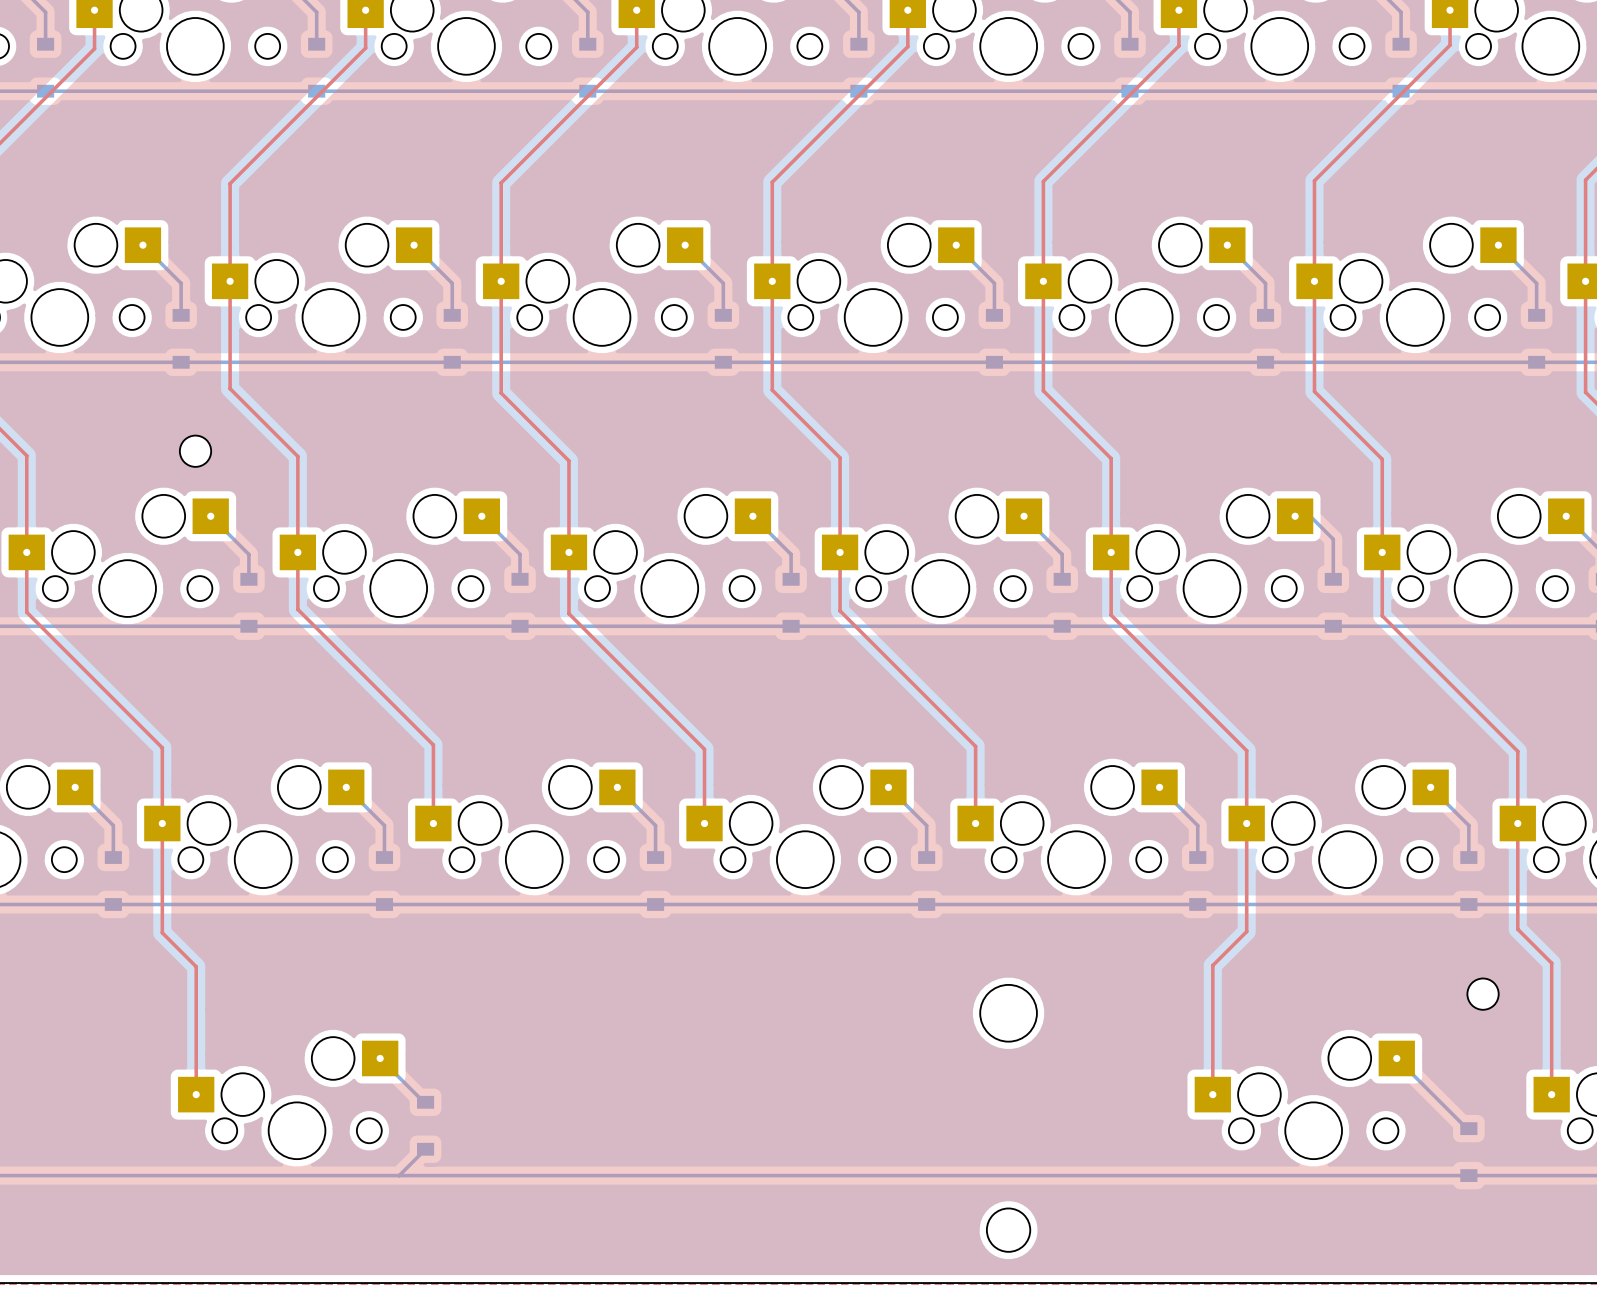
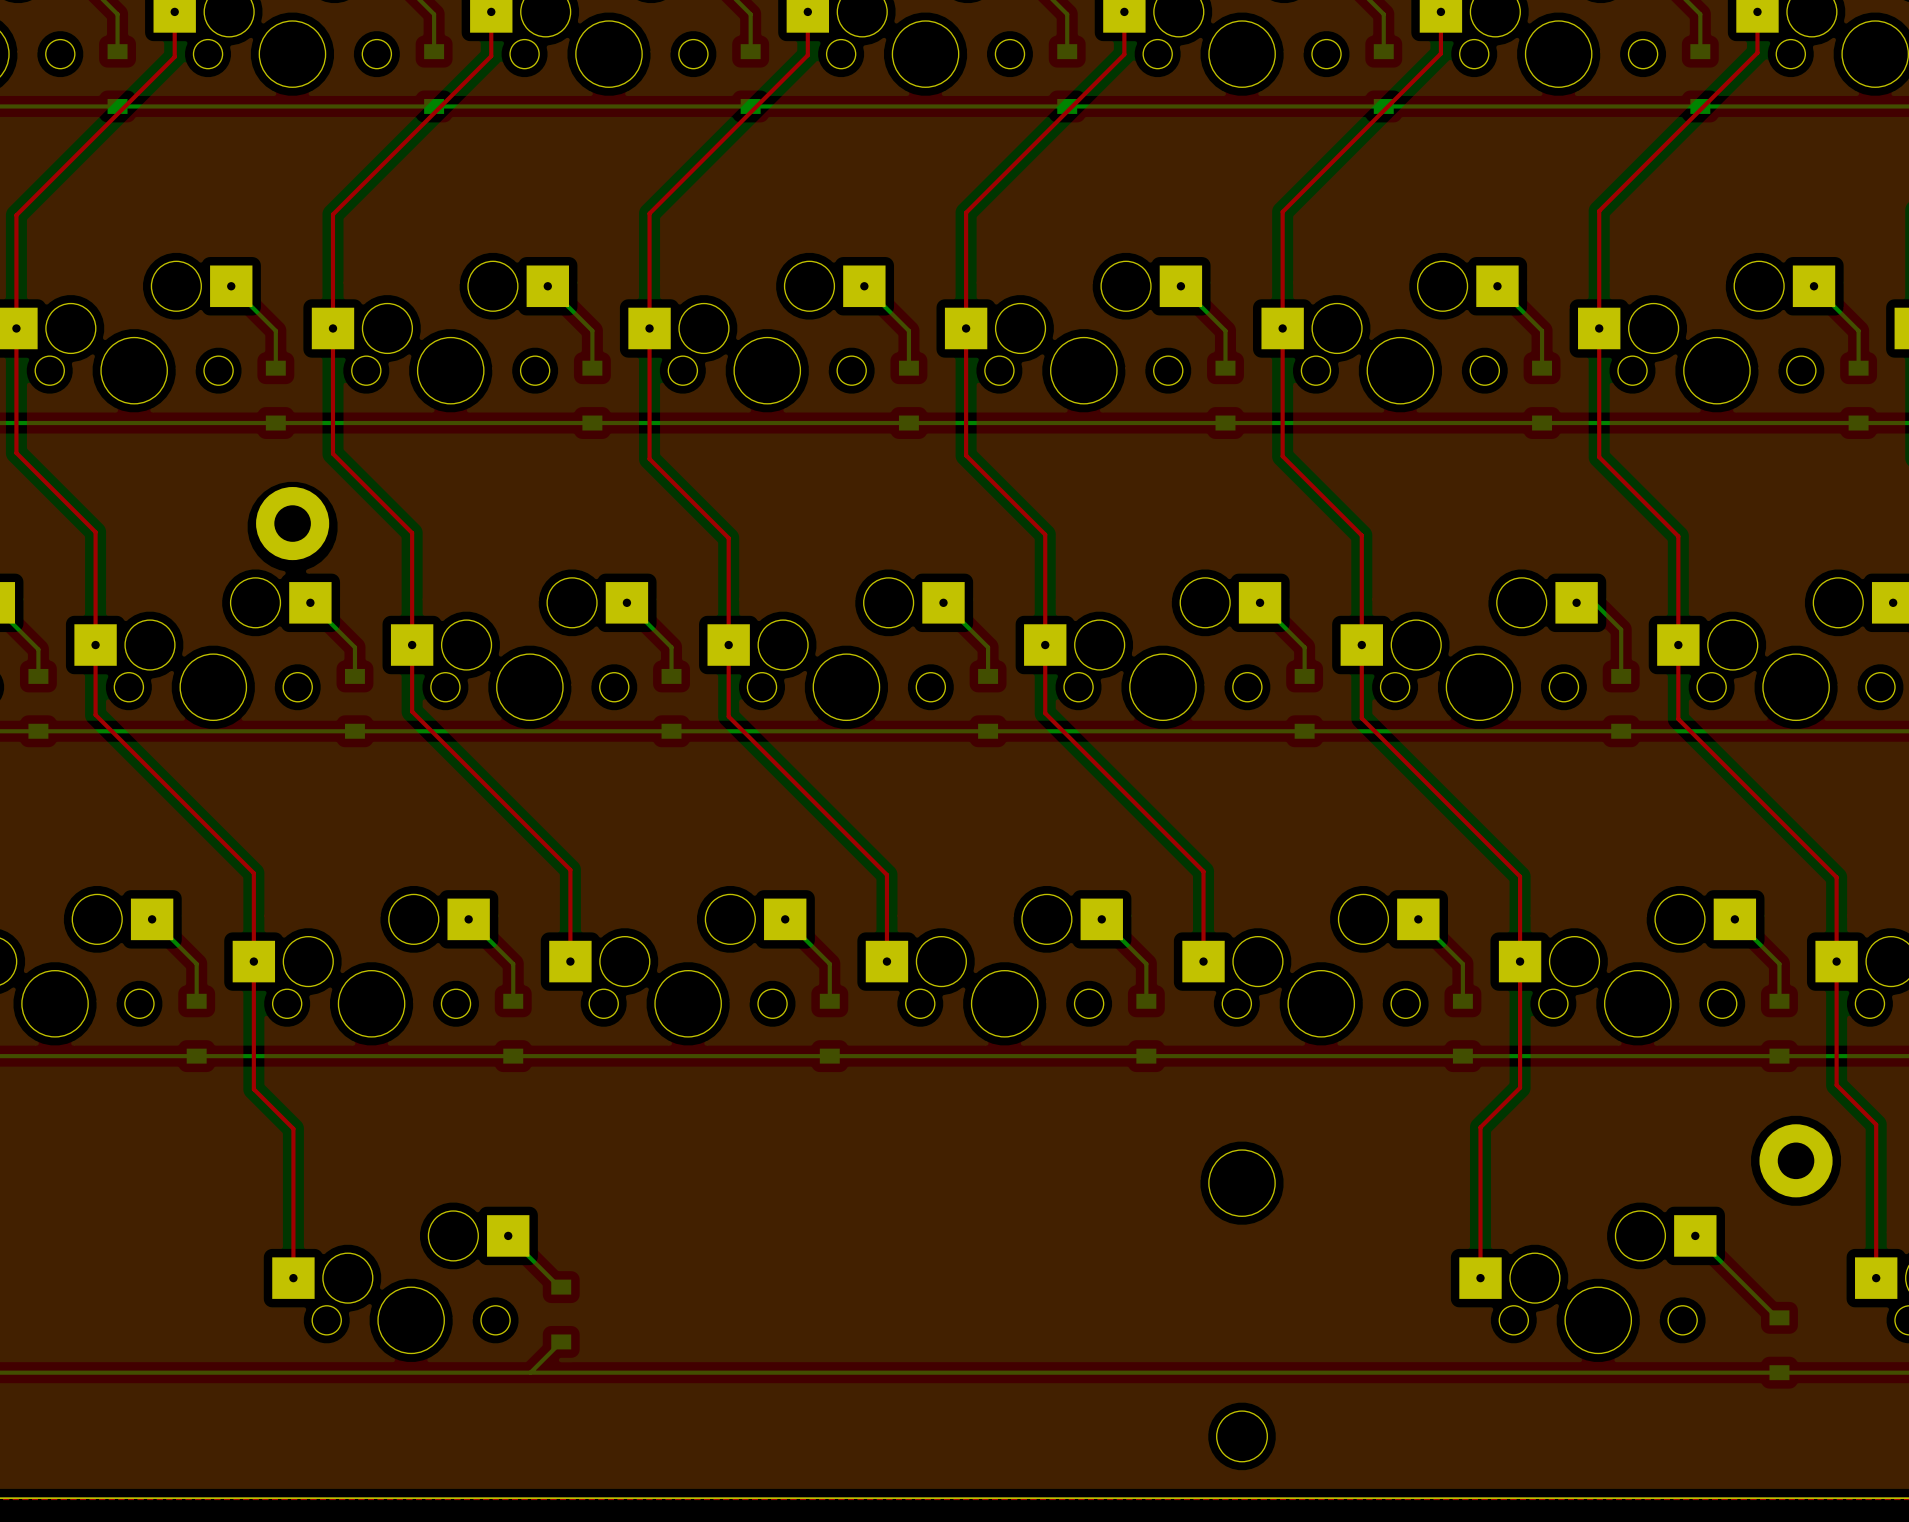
part footprint: [179, 435, 212, 467] -> [256, 486, 330, 561]
part footprint: [1467, 978, 1499, 1010] -> [1759, 1124, 1833, 1198]

